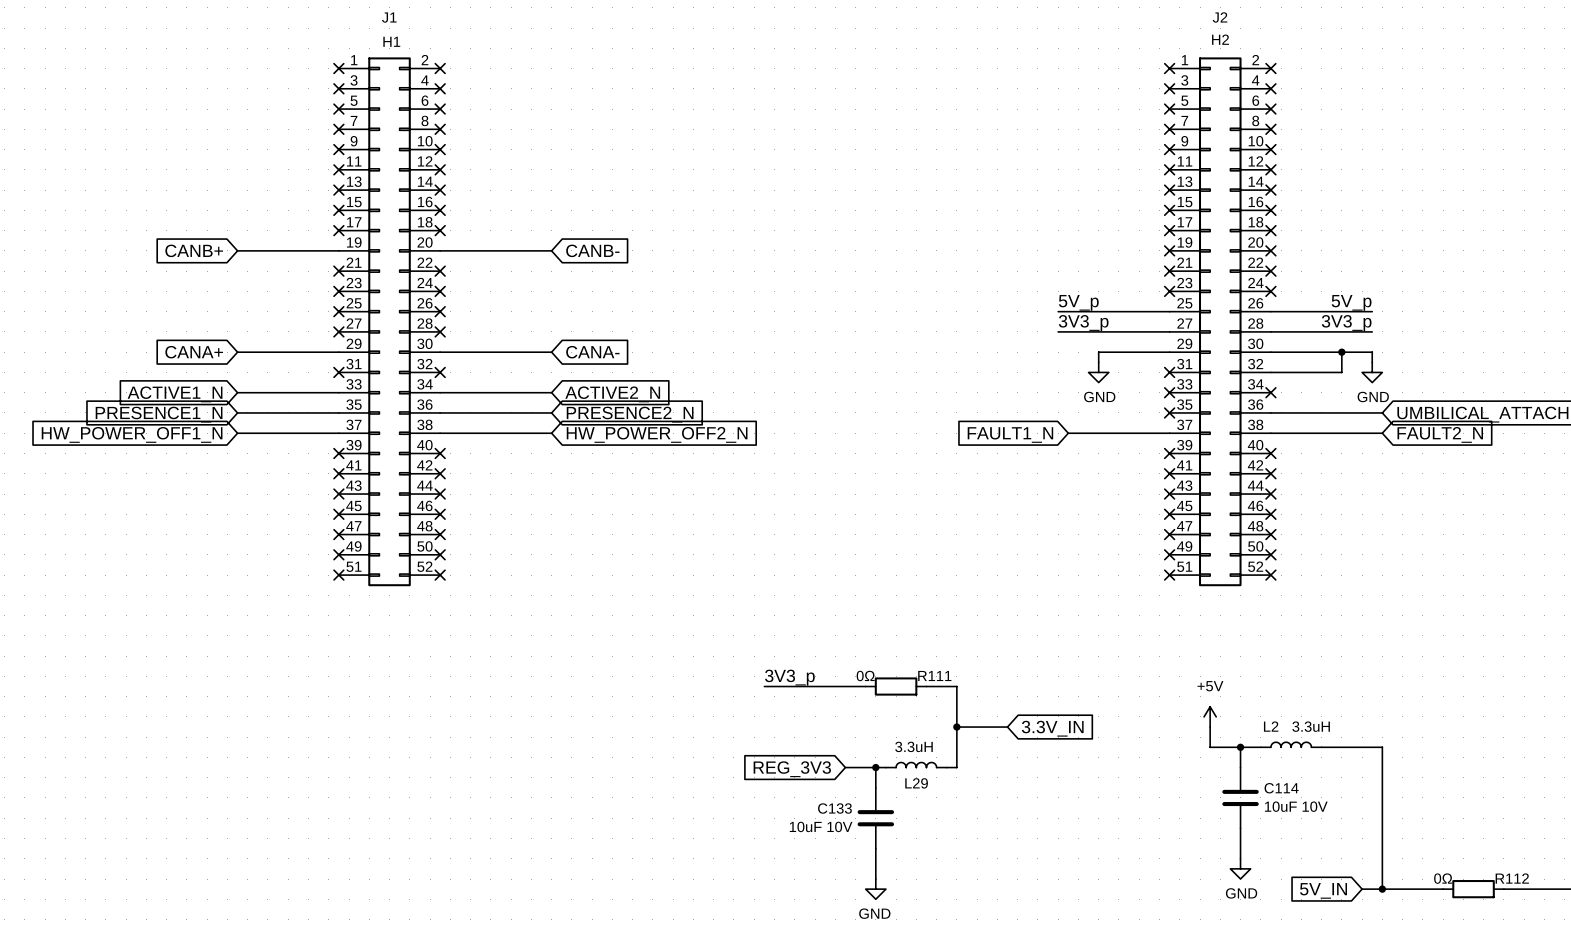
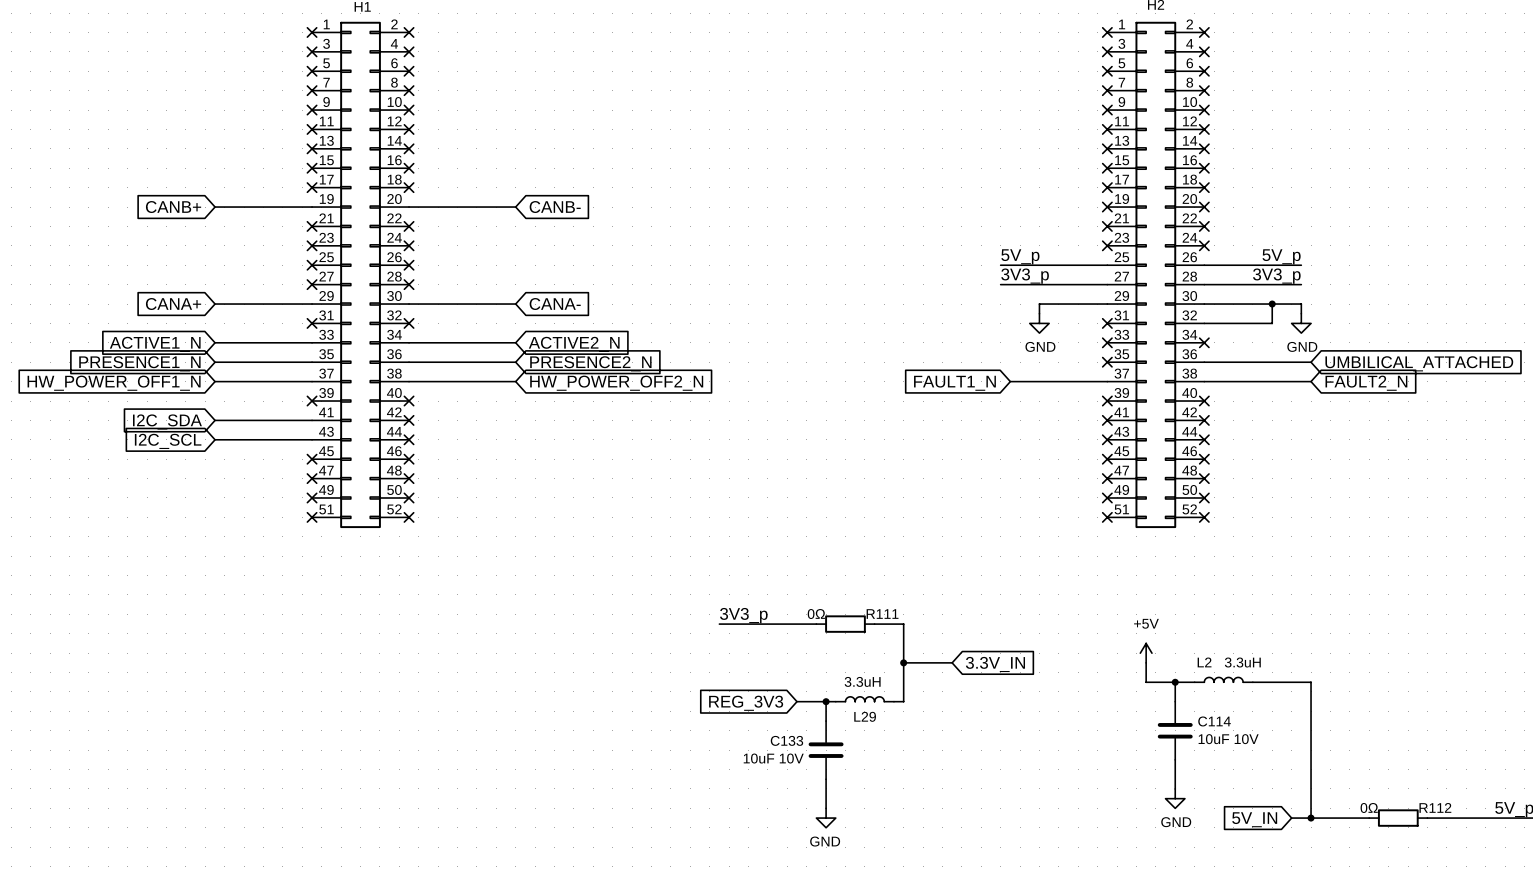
wire: none -> (215, 420) (312, 420)
no-connect mark: (338, 473) -> none
global label: none -> I2C_SDA (167, 422)
wire: none -> (215, 439) (312, 439)
no-connect mark: (338, 494) -> none
global label: none -> I2C_SCL (168, 441)

